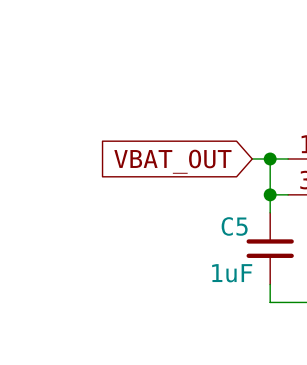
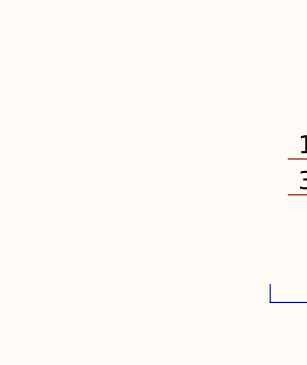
wire: (252, 158) (288, 158) -> none
wire: (270, 158) (270, 212) -> none
junction: (270, 158) -> none
global label: VBAT_OUT (172, 161) -> none
wire: (270, 194) (288, 194) -> none
junction: (270, 194) -> none
C5: 1uF (270, 248) -> none

